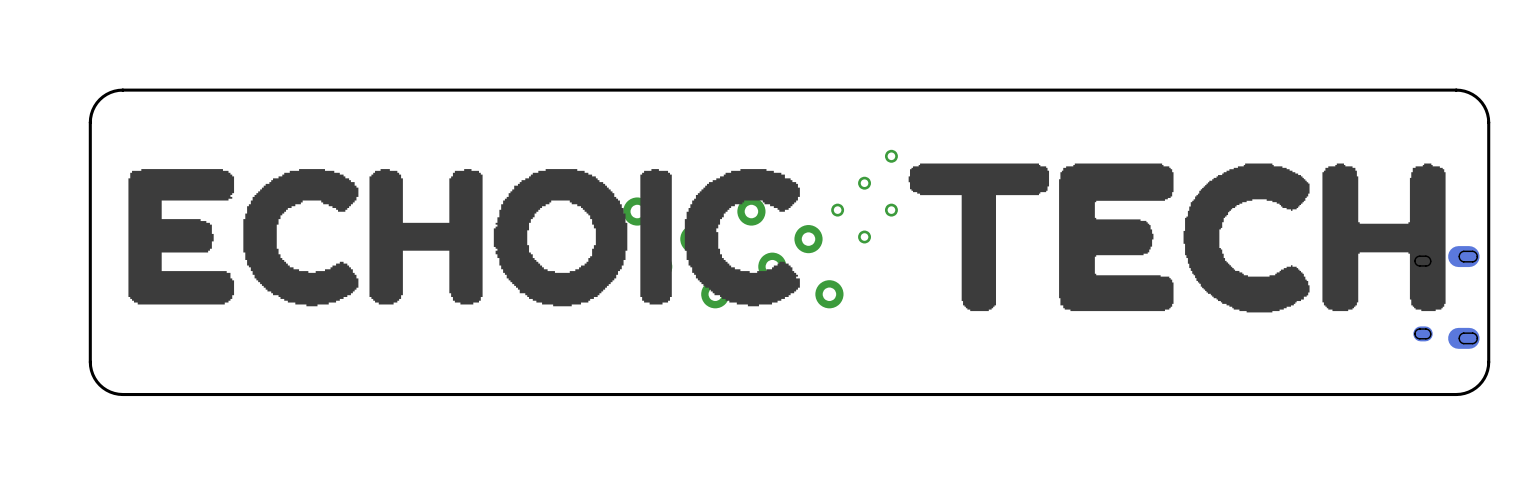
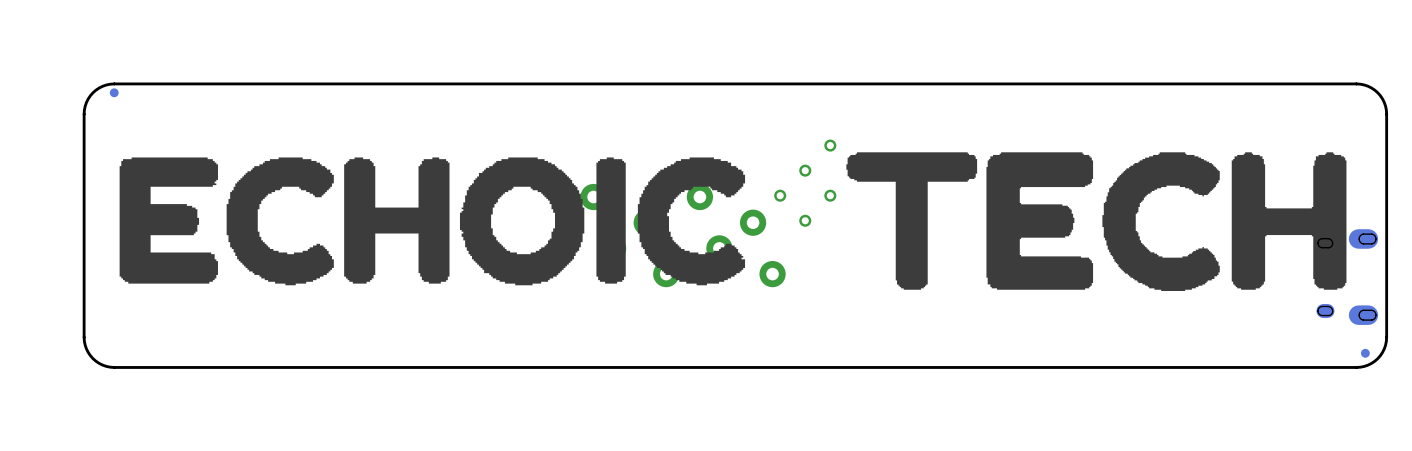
part: none -> (114, 92)
part: none -> (1365, 353)

